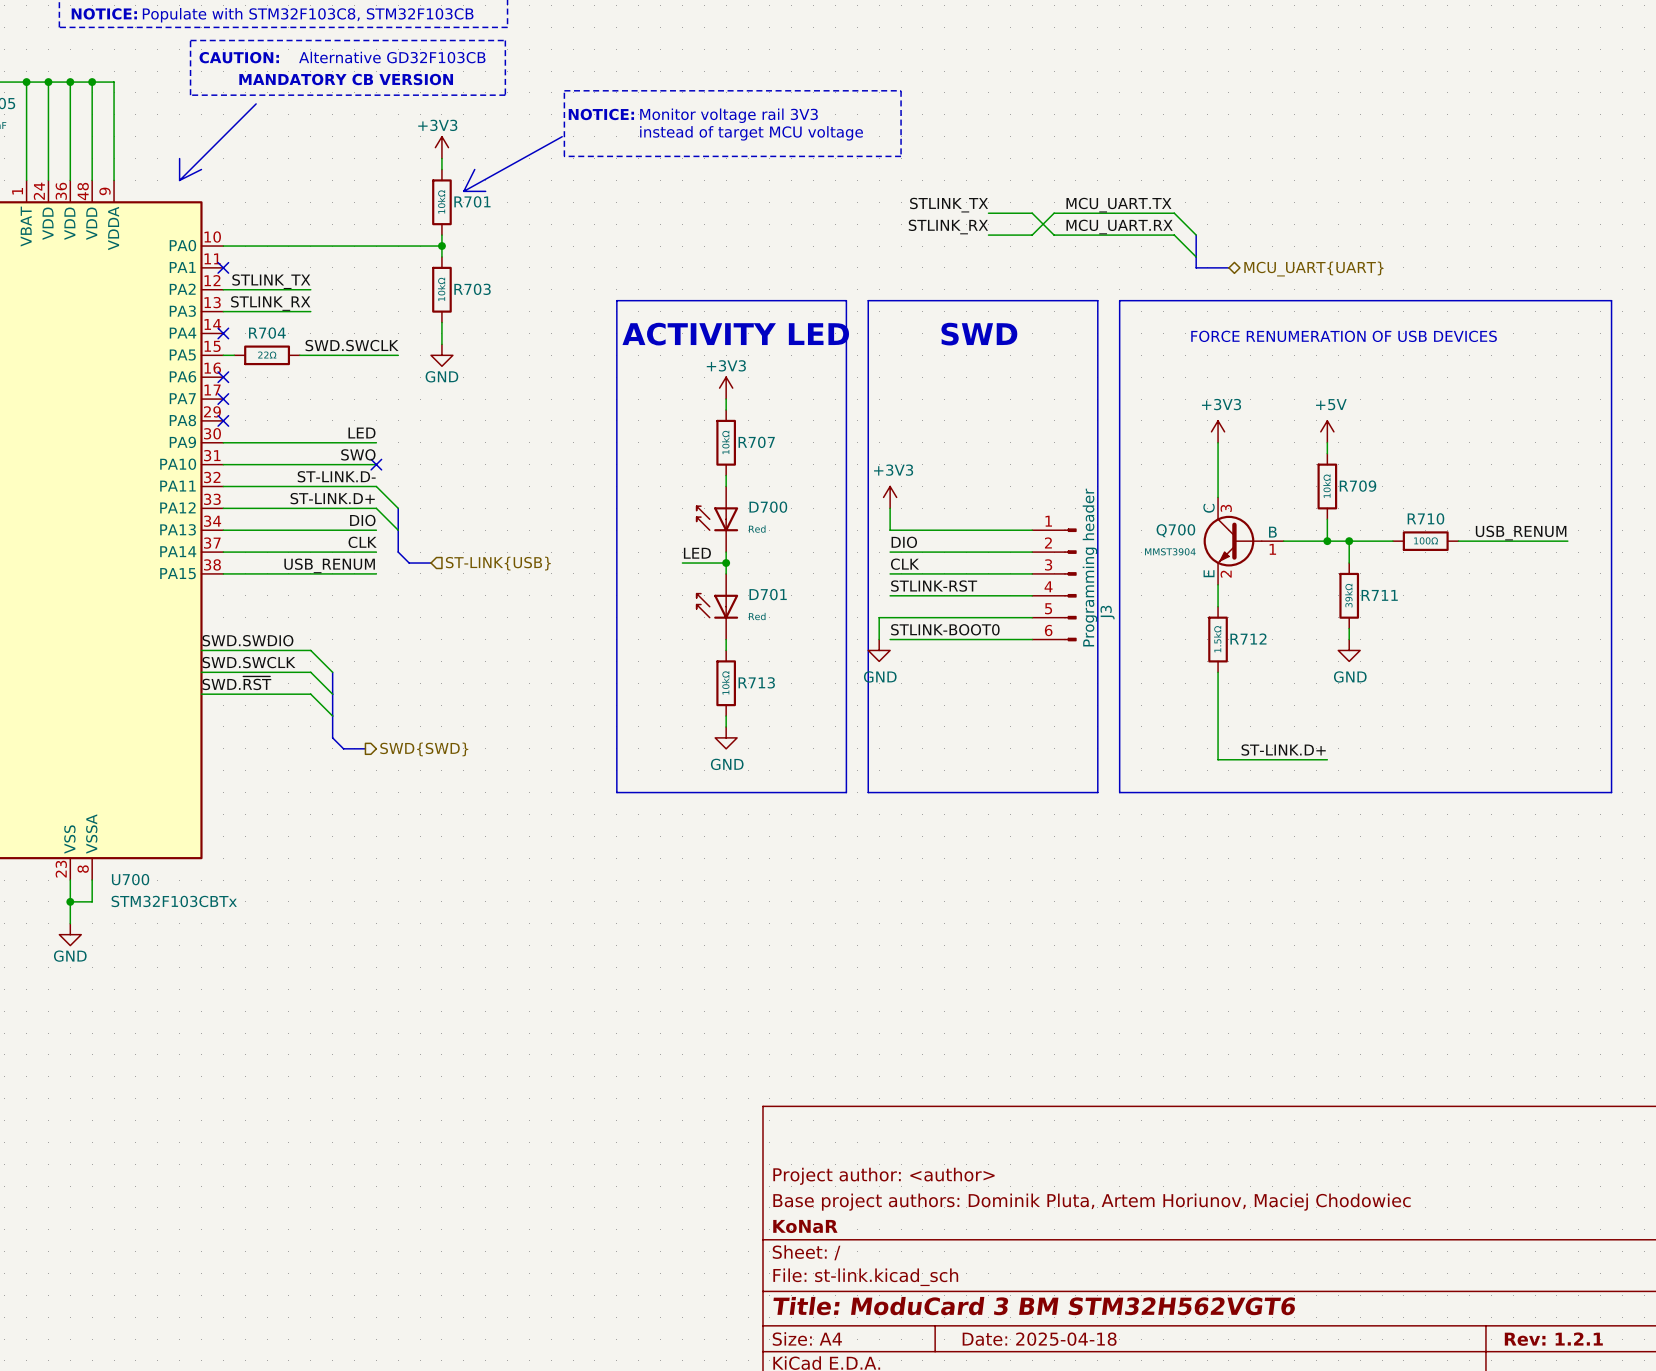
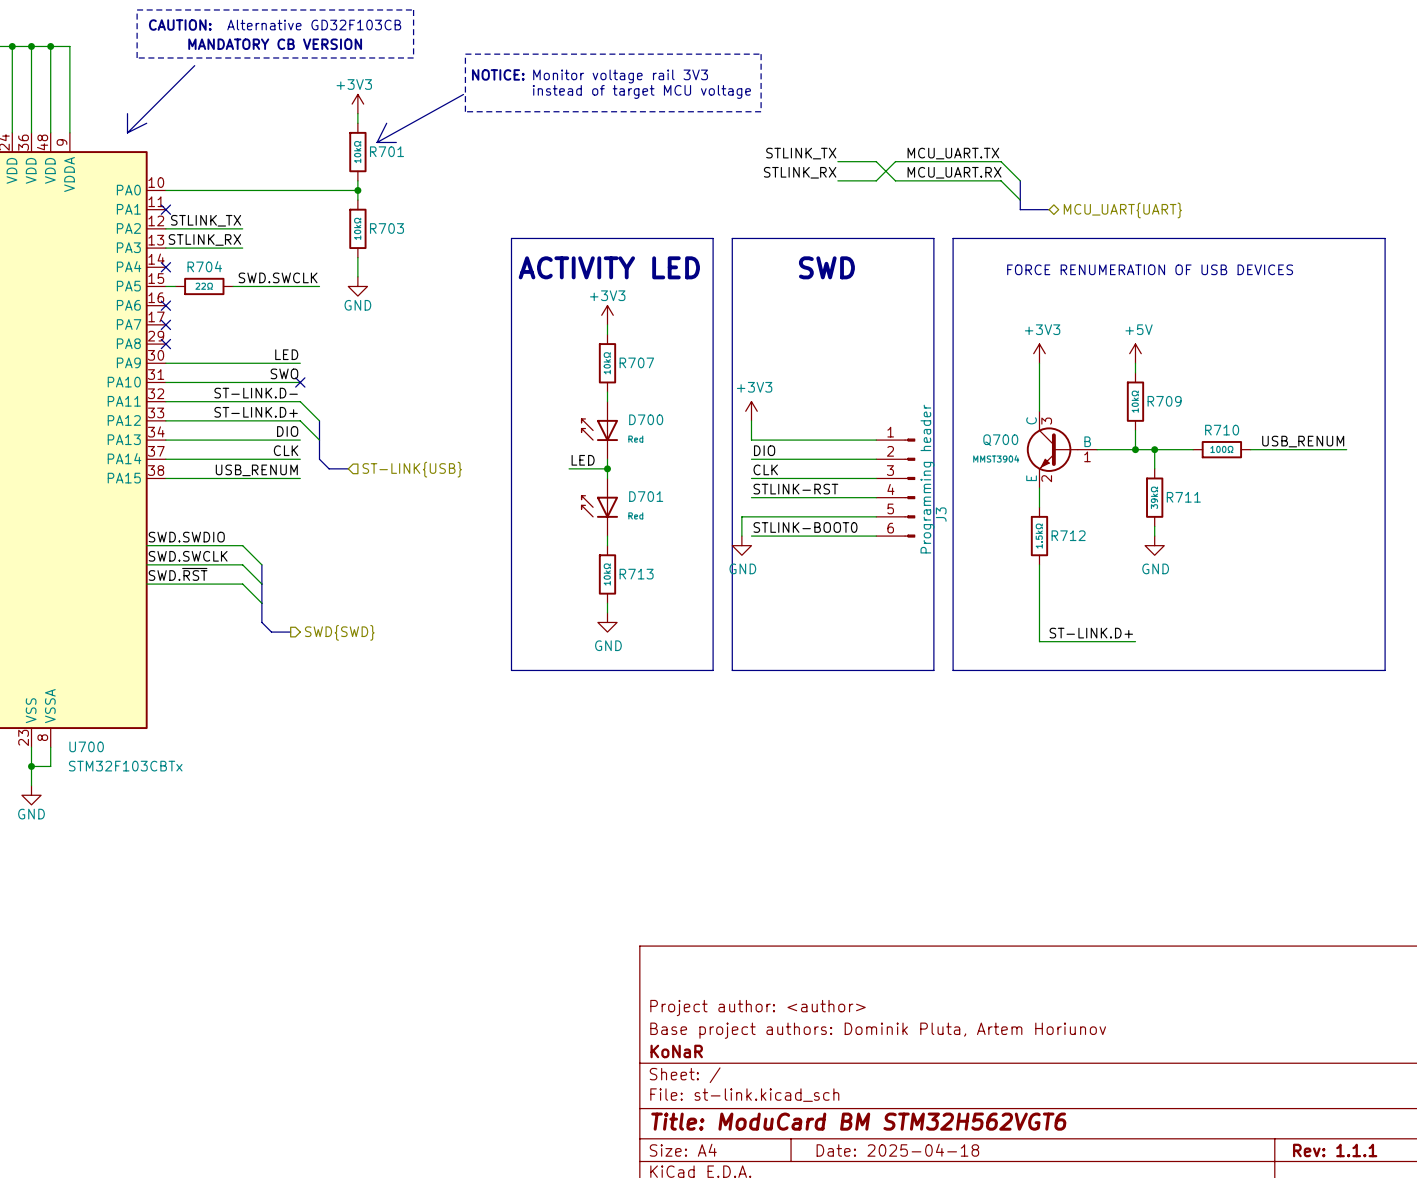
title block: Base project authors: Dominik Pluta, Artem Horiunov, Maciej Chodowiec (1092, 1202) -> Base project authors: Dominik Pluta, Artem Horiunov (878, 1030)
title block: Title: ModuCard 3 BM STM32H562VGT6 (1034, 1306) -> Title: ModuCard BM STM32H562VGT6 (858, 1121)
title block: Rev: 1.2.1 (1553, 1339) -> Rev: 1.1.1 (1335, 1150)

